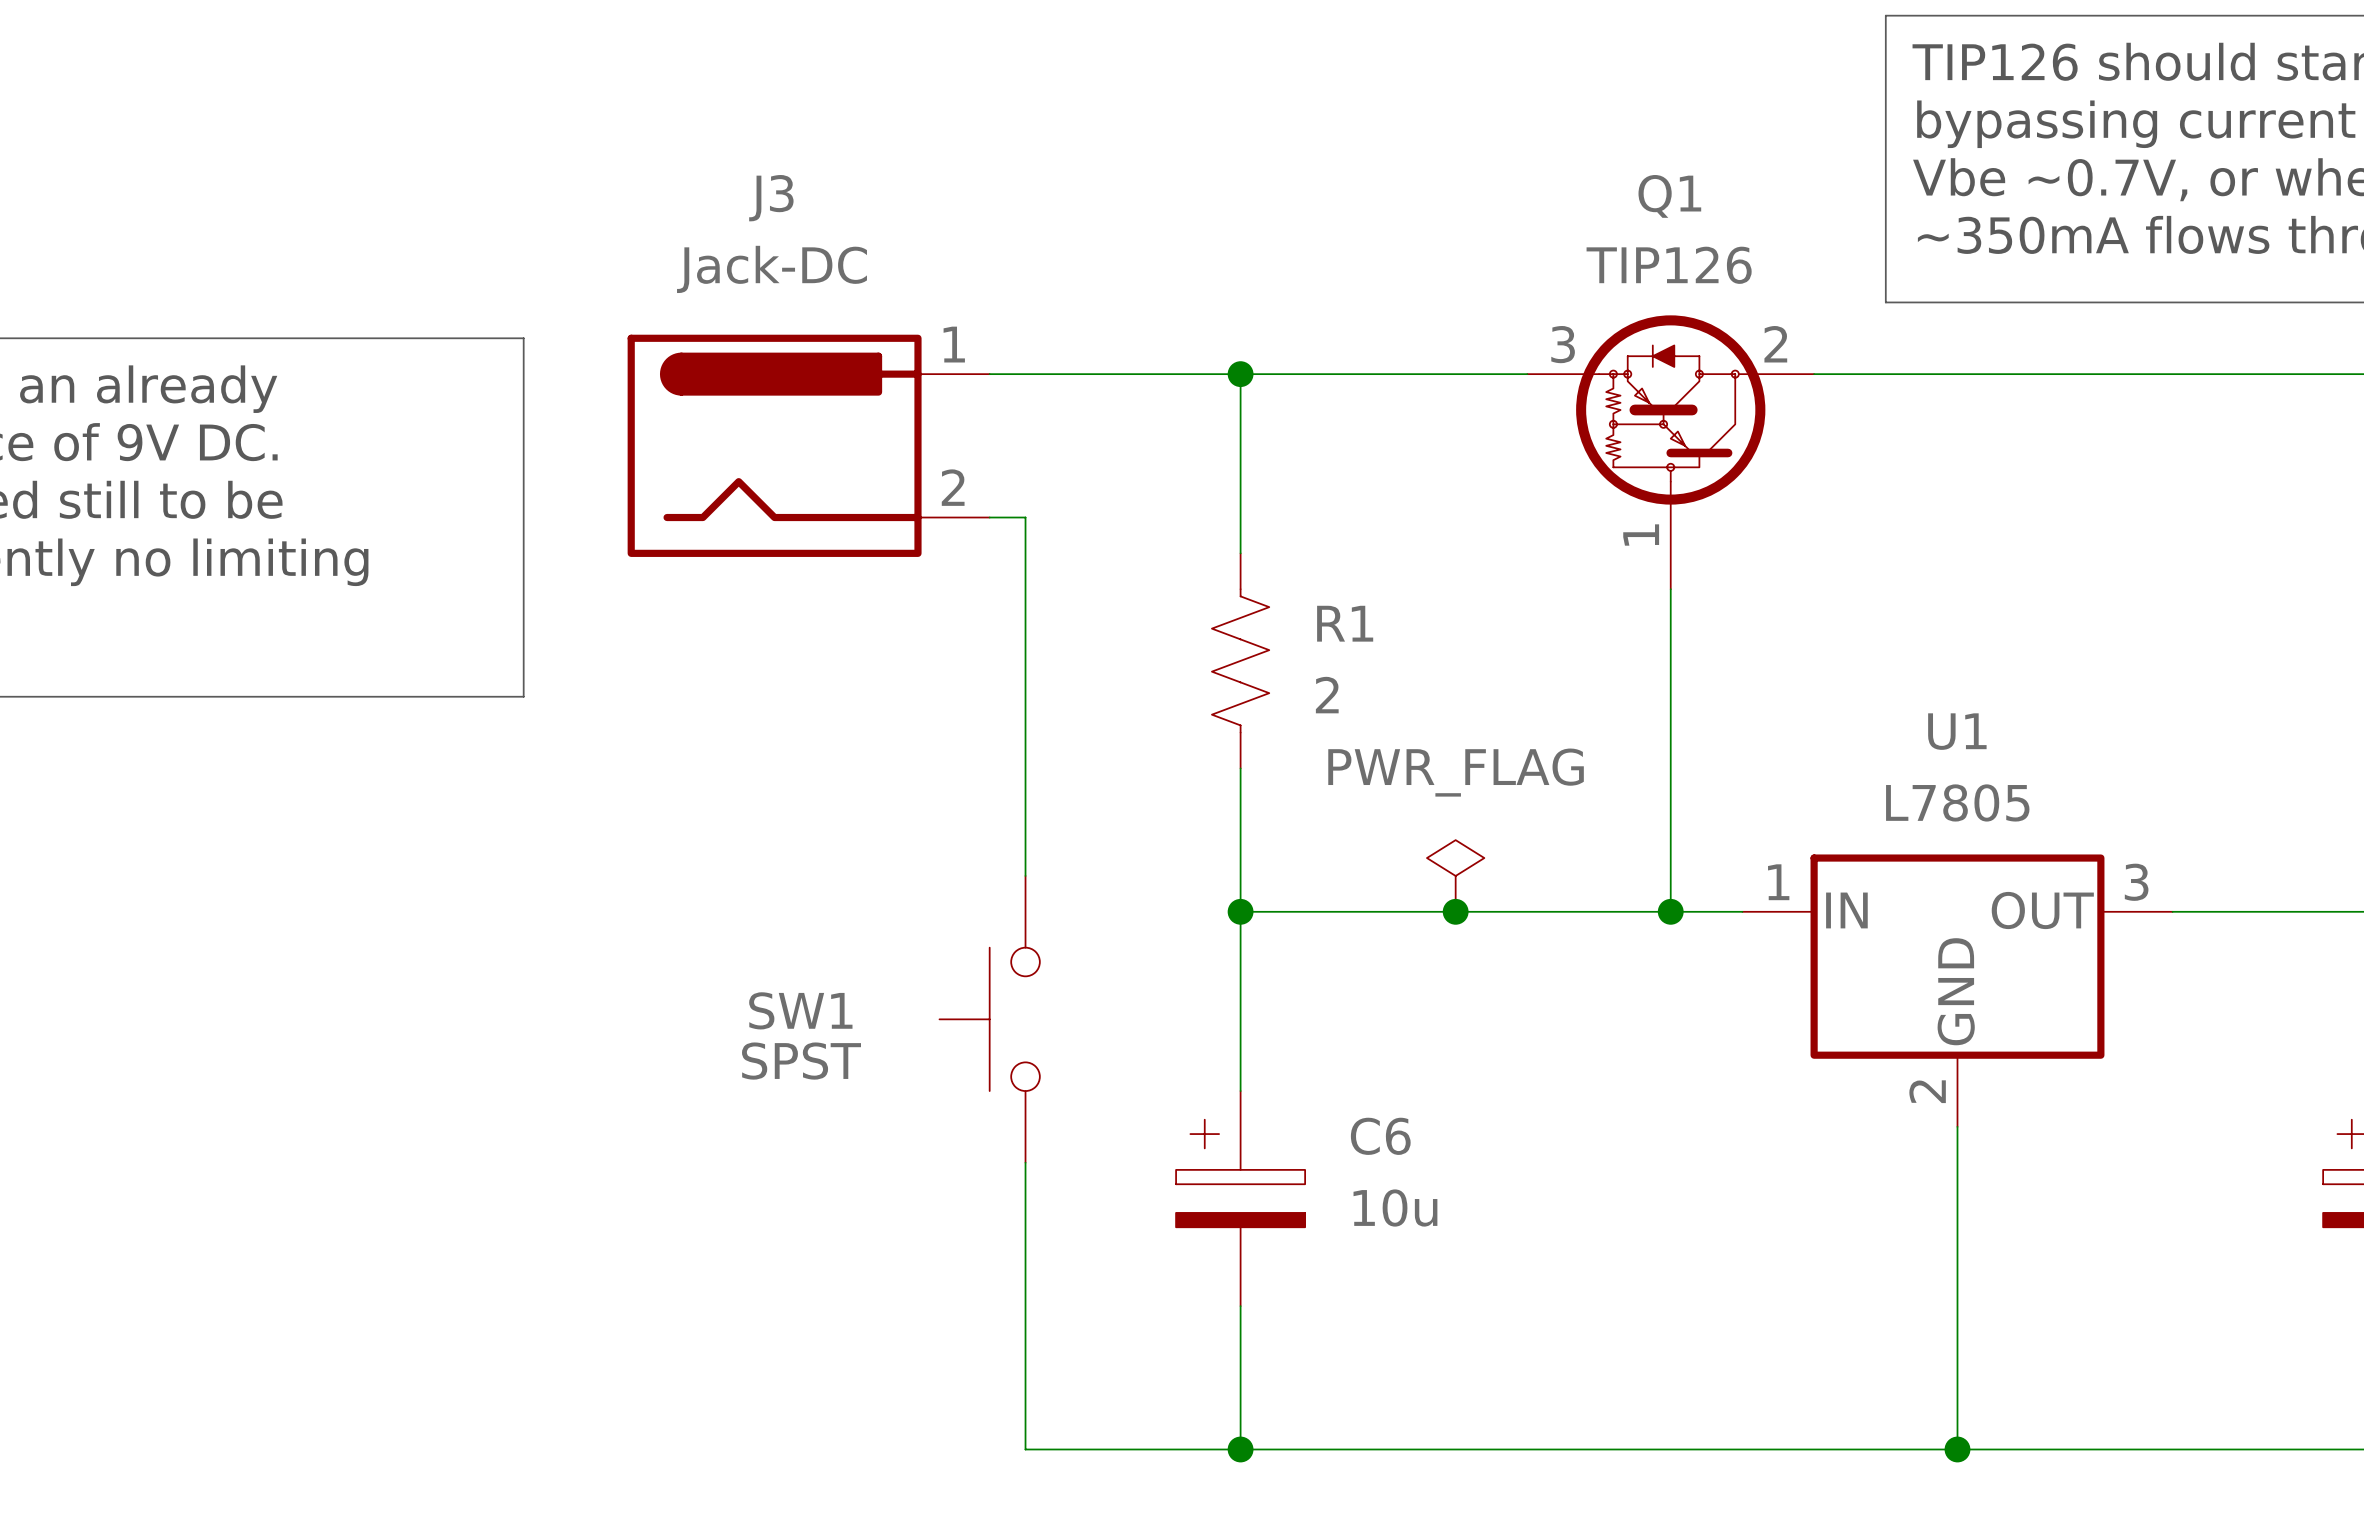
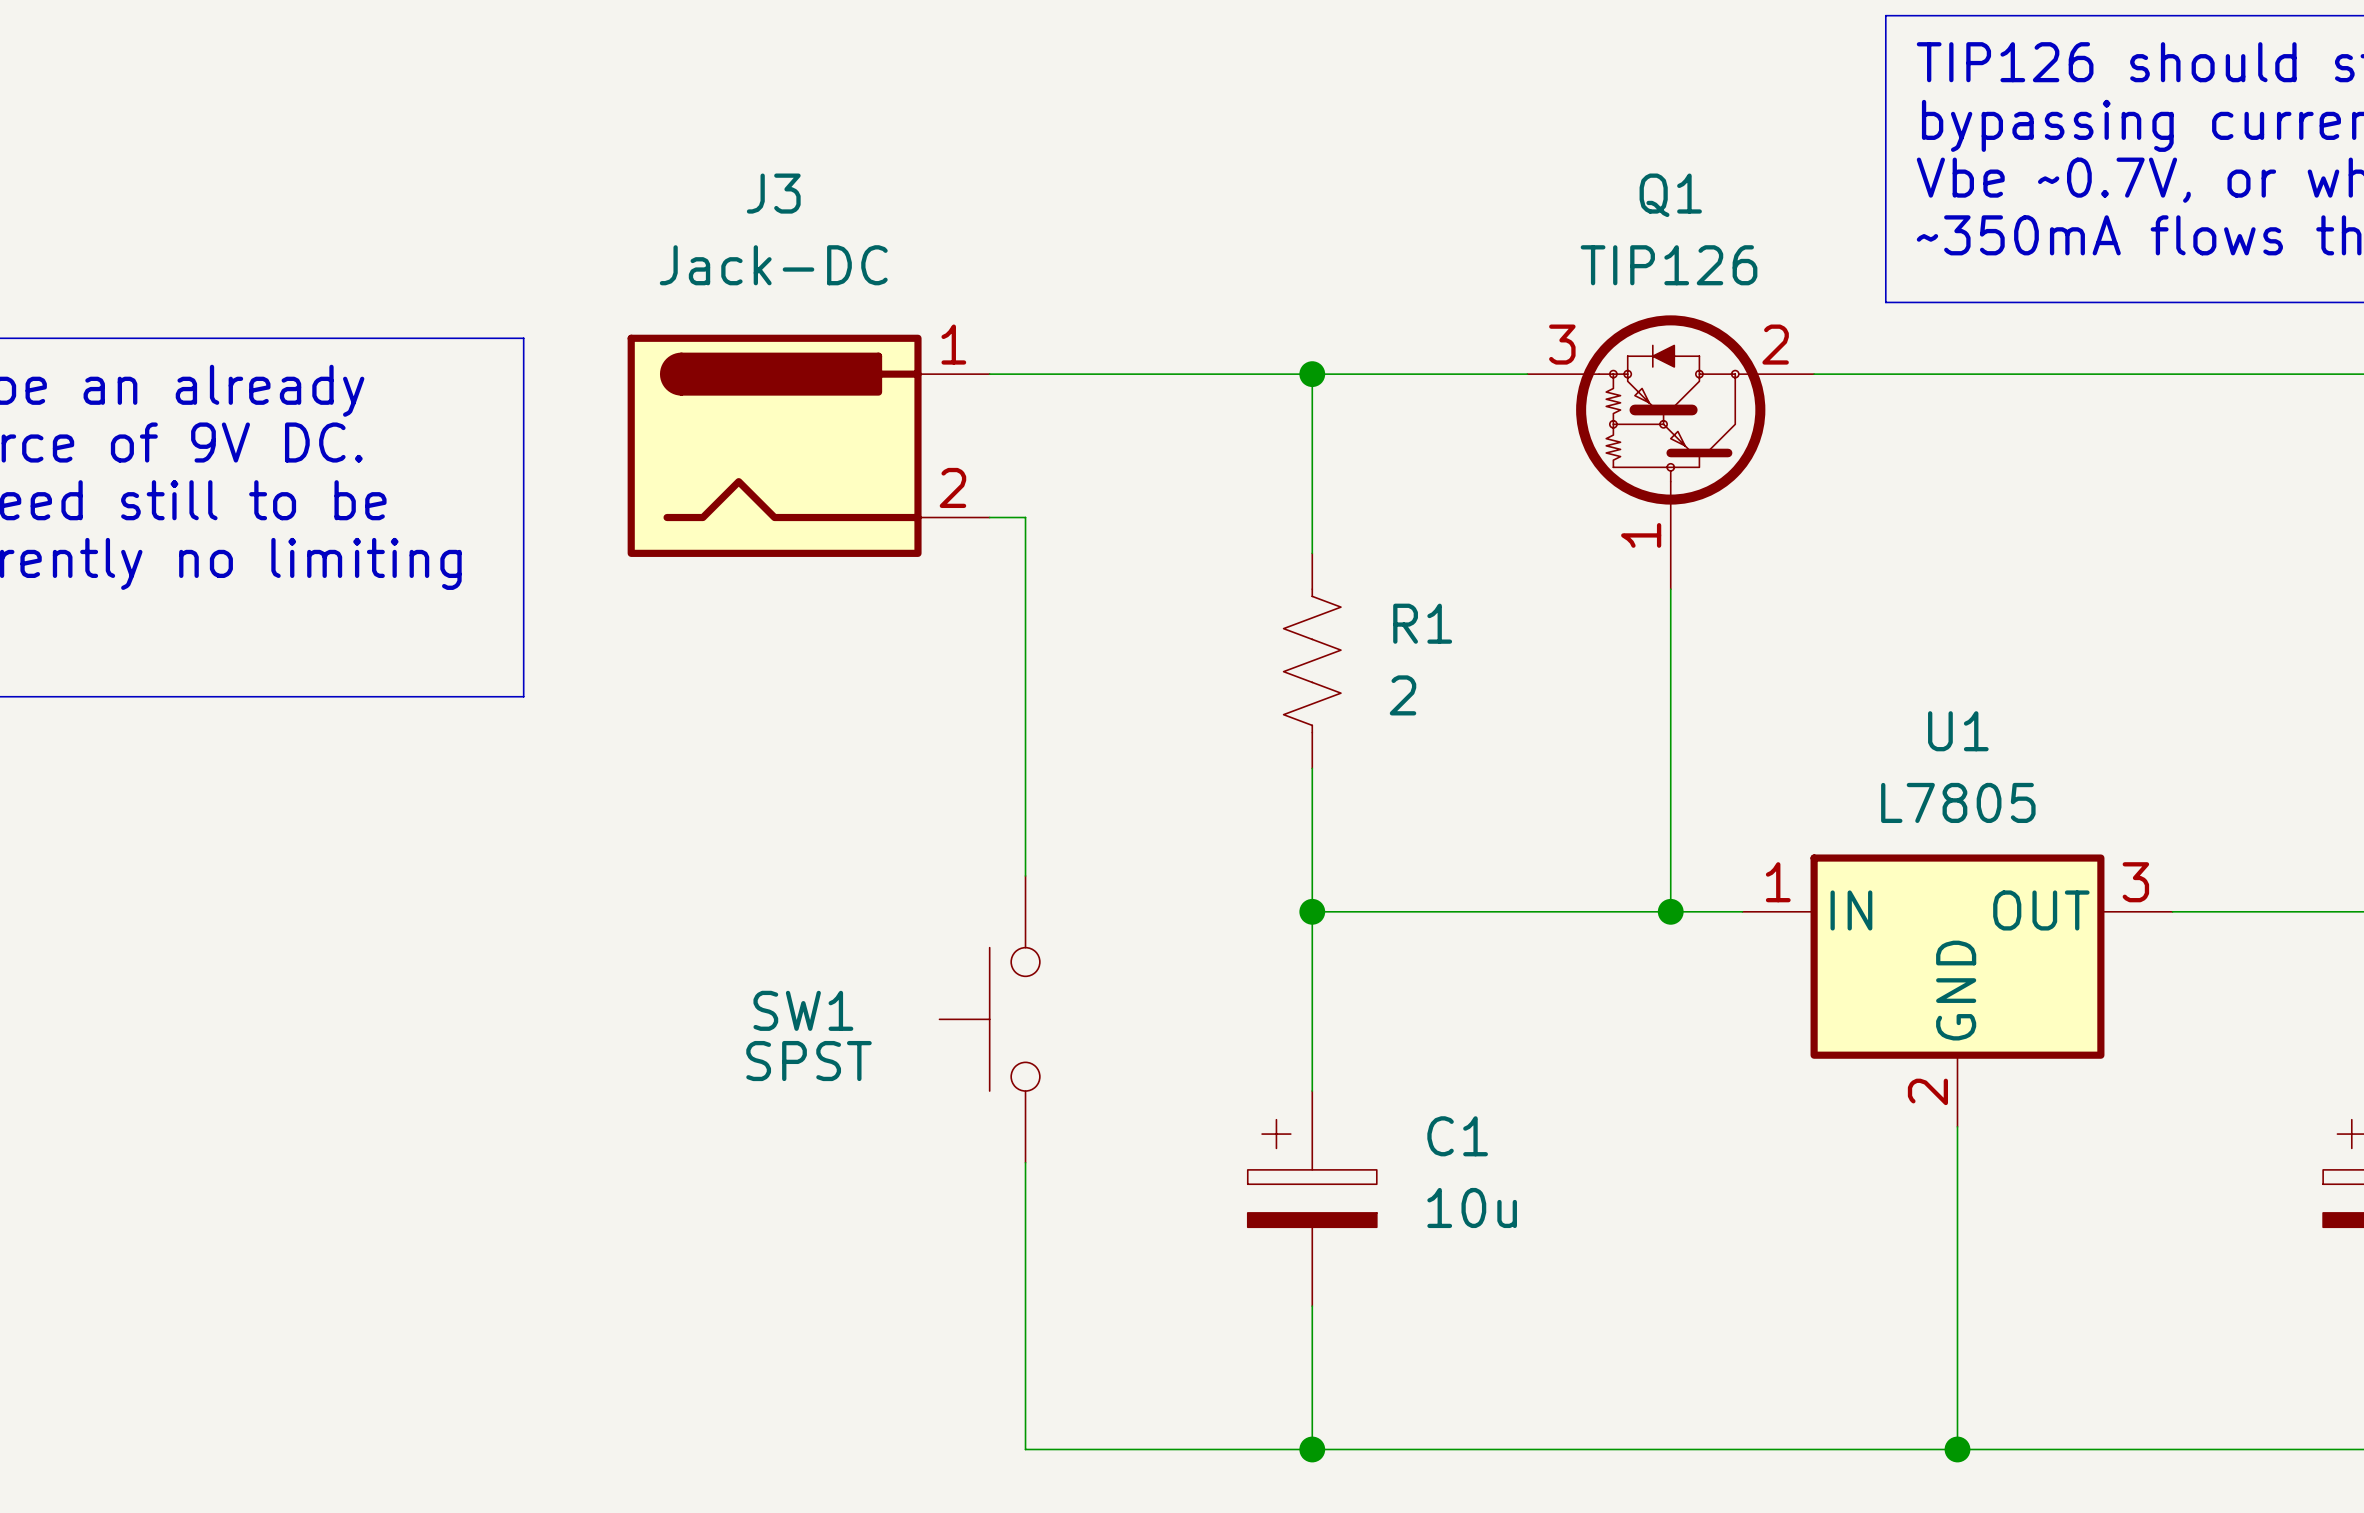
wire: (1240, 374) (1240, 553) -> (1312, 374) (1312, 553)
junction position: (1240, 374) -> (1312, 374)
R1 position: (1240, 660) -> (1312, 660)
wire: (1240, 768) (1240, 1091) -> (1312, 768) (1312, 1091)
power symbol: PWR_FLAG (1455, 875) -> none
wire: (1240, 911) (1312, 911) -> none
junction: (1240, 911) -> none
junction: none -> (1312, 911)
junction: (1455, 911) -> none
C6: 10u (1240, 1198) -> none
C1: none -> 10u (1312, 1198)
wire: (1240, 1306) (1240, 1449) -> (1312, 1306) (1312, 1449)
junction position: (1240, 1449) -> (1312, 1449)

